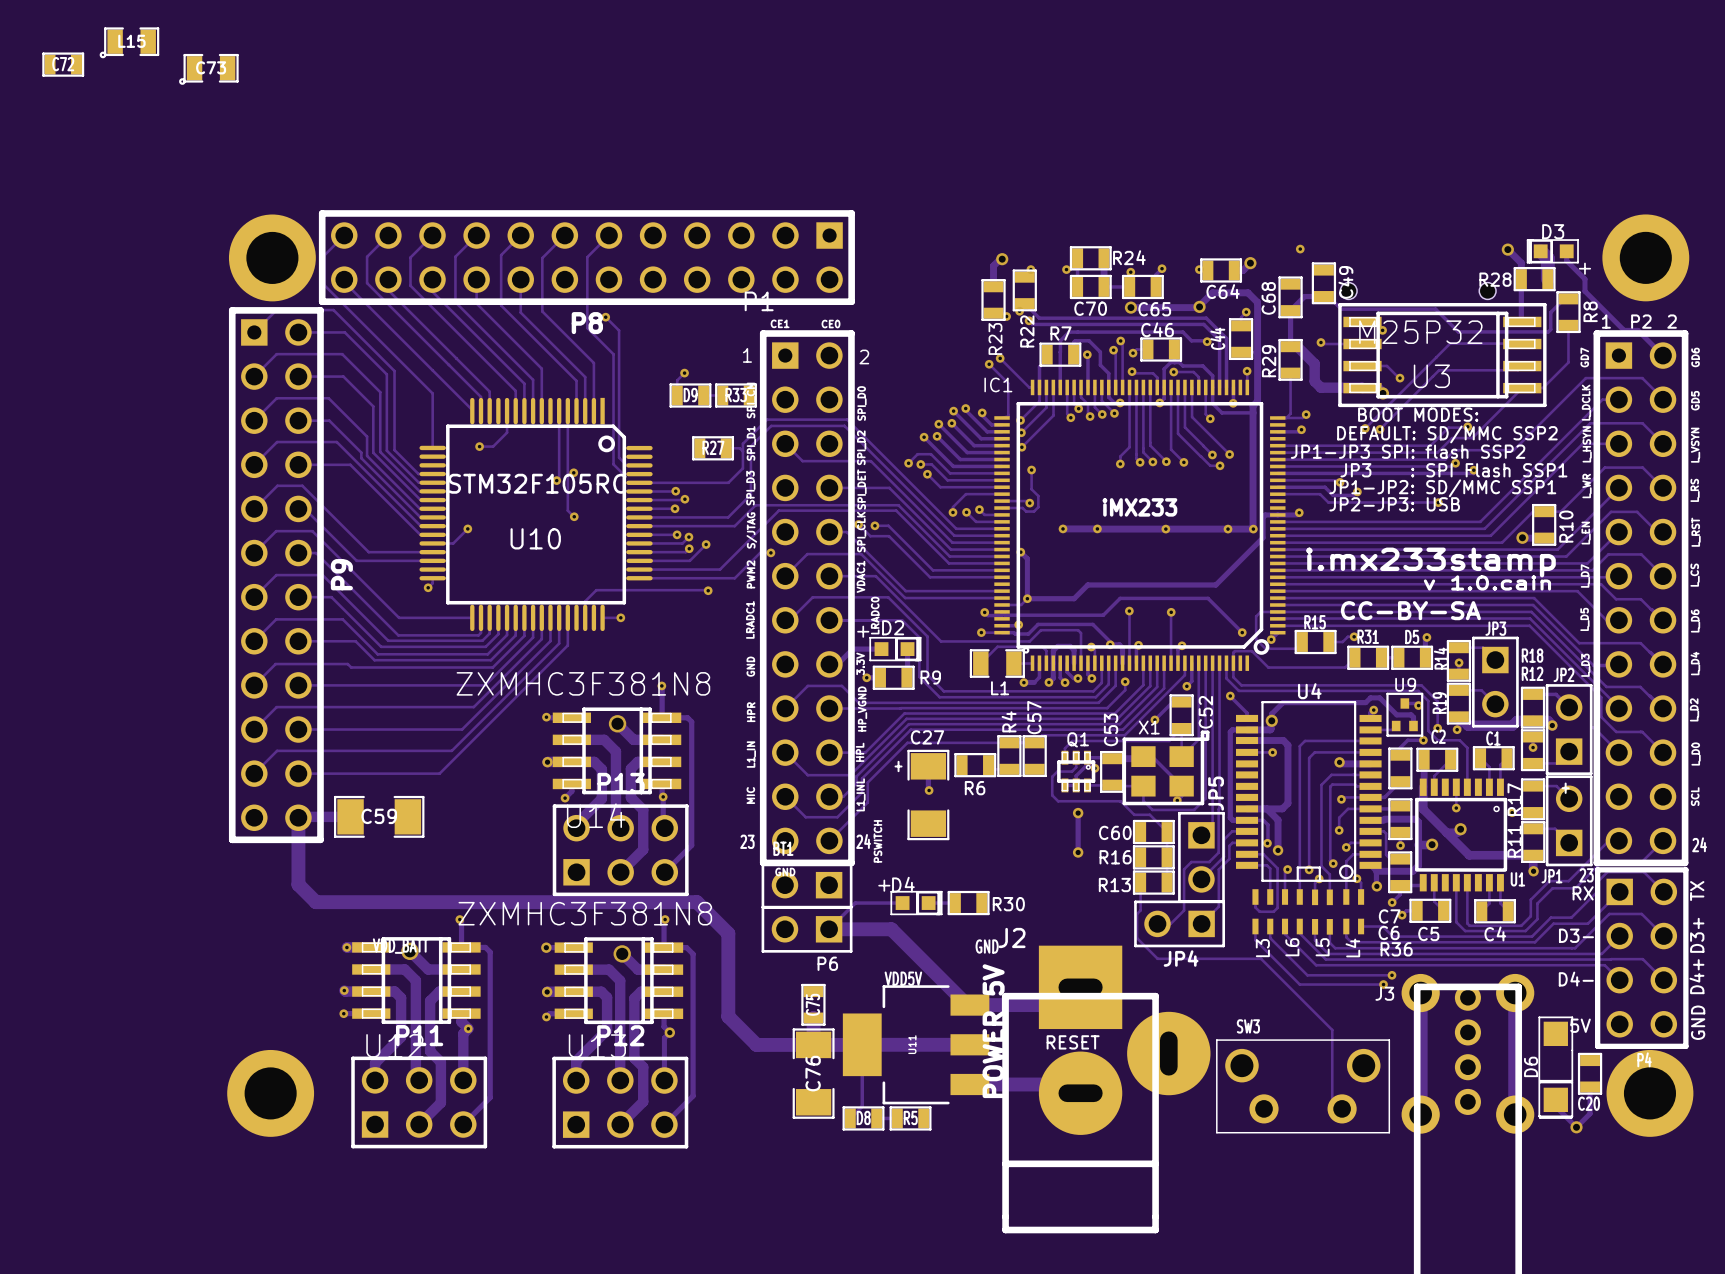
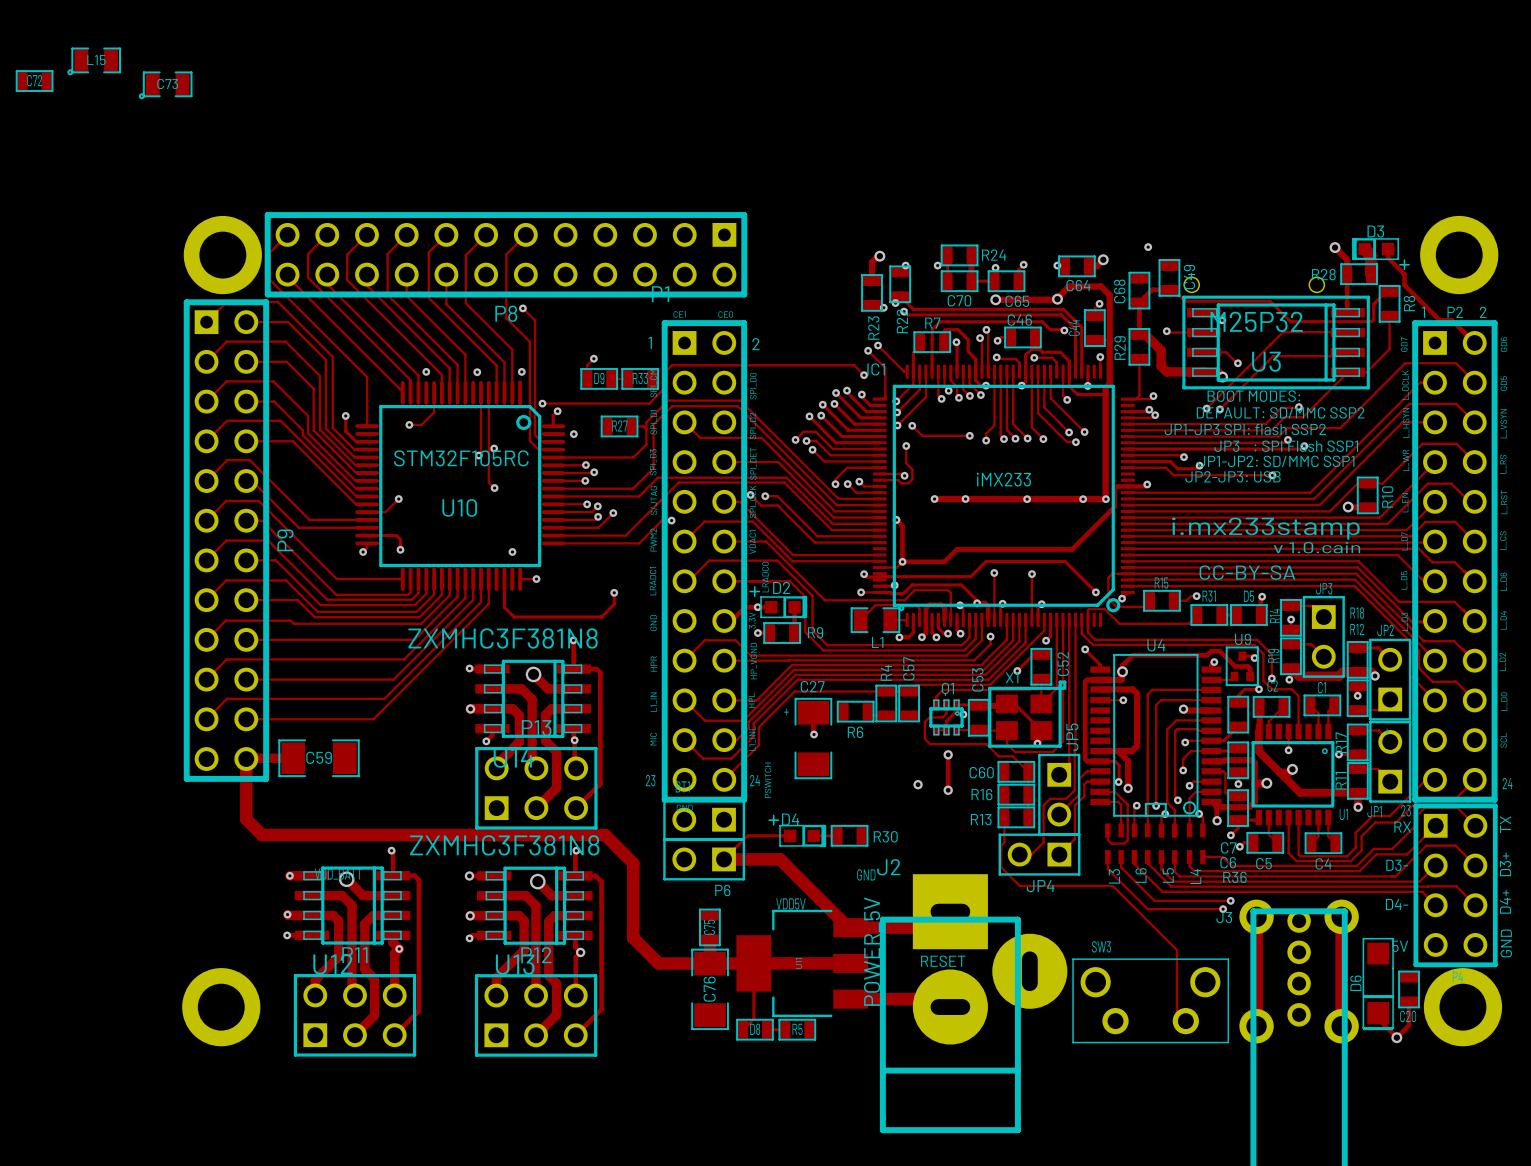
via: none -> (426, 371)
via: none -> (521, 371)
via: none -> (477, 372)
track: none -> (864, 375) (854, 365) (671, 365) (666, 370) (666, 386) (649, 403) (542, 403)
via: none -> (864, 375)
via: none -> (542, 403)
track: none -> (557, 411) (553, 415) (553, 426)
via: none -> (557, 411)
track: none -> (1155, 415) (1152, 417) (1127, 417)
via: none -> (1155, 415)
track: none -> (345, 415) (345, 431) (356, 441) (367, 441)
via: none -> (345, 415)
track: none -> (912, 425) (922, 435) (969, 435)
via: none -> (912, 425)
via: none -> (573, 434)
via: none -> (969, 435)
track: none -> (367, 535) (396, 535) (400, 539) (400, 549)
via: none -> (400, 549)
via: none -> (512, 551)
track: (708, 590) (596, 590) (585, 601) (585, 617) -> (614, 592) (614, 604) (601, 617) (514, 617) (504, 607) (504, 579)
via position: (708, 590) -> (614, 592)
via: none -> (757, 607)
via: none -> (918, 784)

